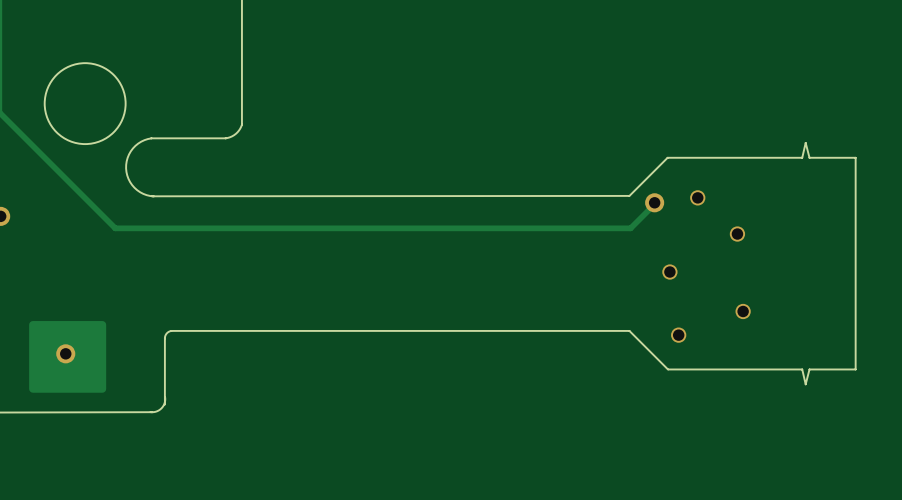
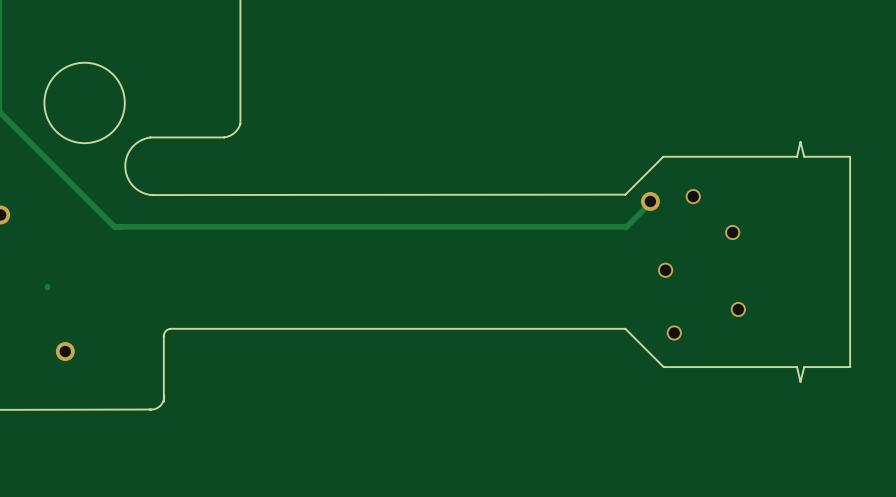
track: none -> (47, 286) (47, 287)
drawing: [29, 321, 107, 393] -> none

